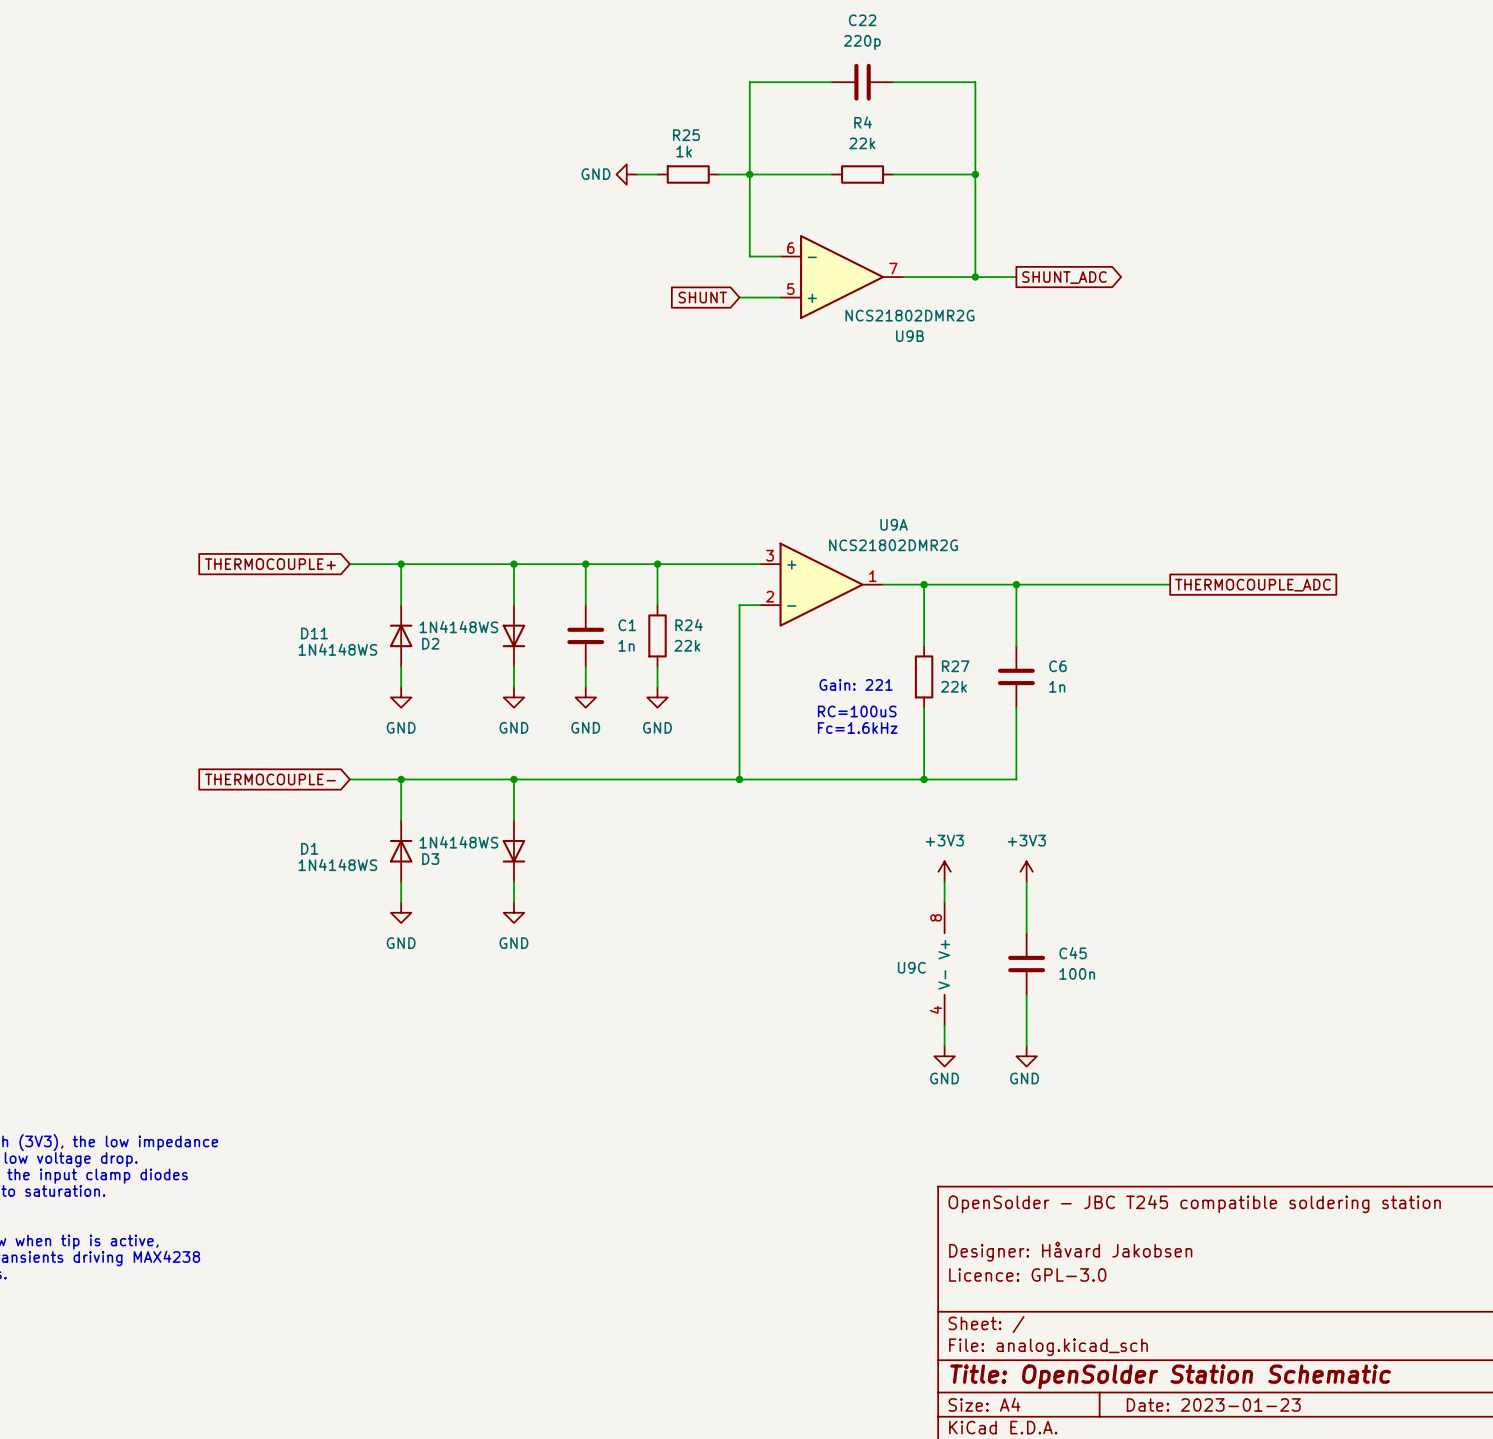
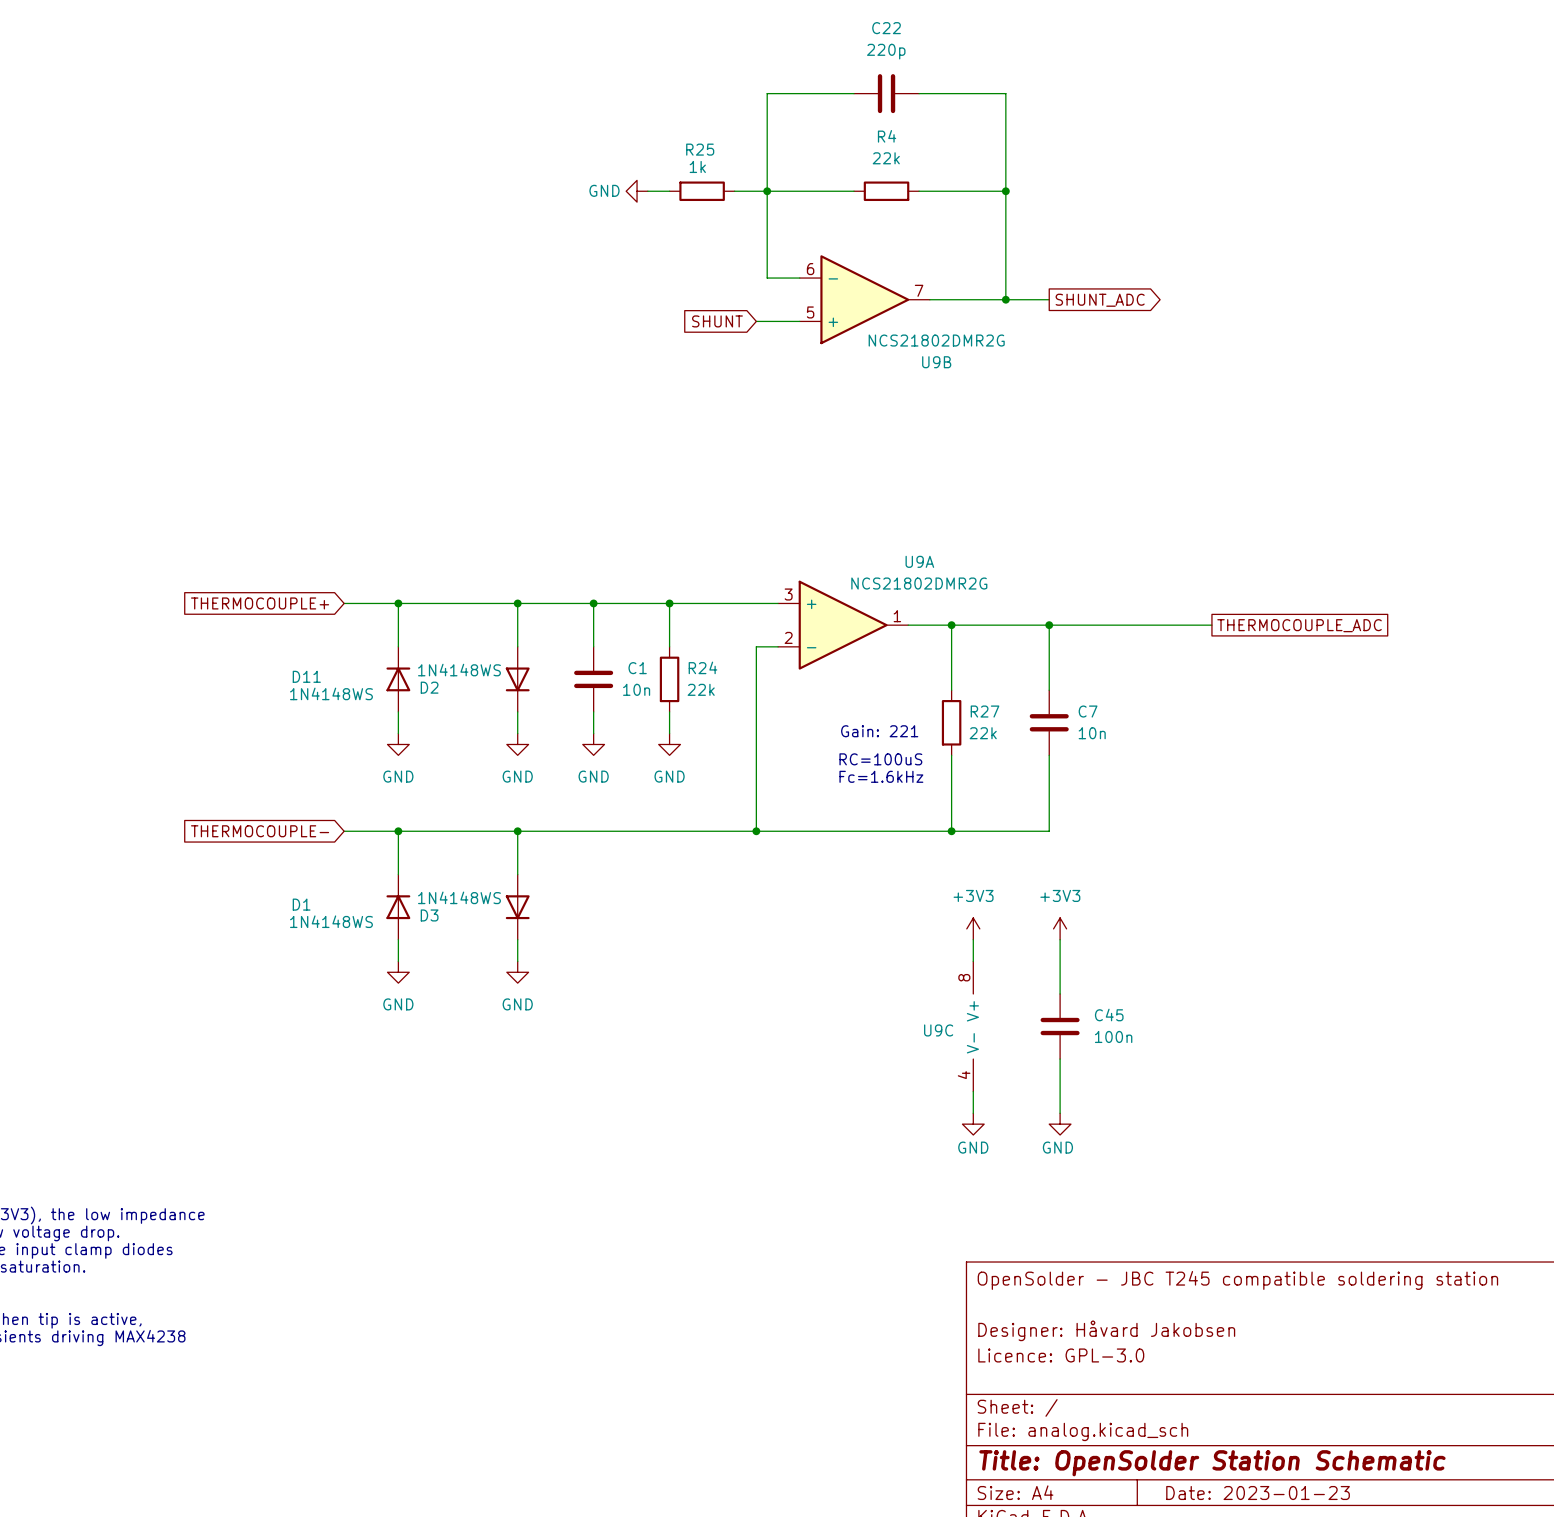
C1 value: 1n (626, 645) -> 10n (636, 689)
C6 name: C6 (1057, 666) -> C7 (1088, 711)
C6 value: 1n (1057, 686) -> 10n (1092, 733)

